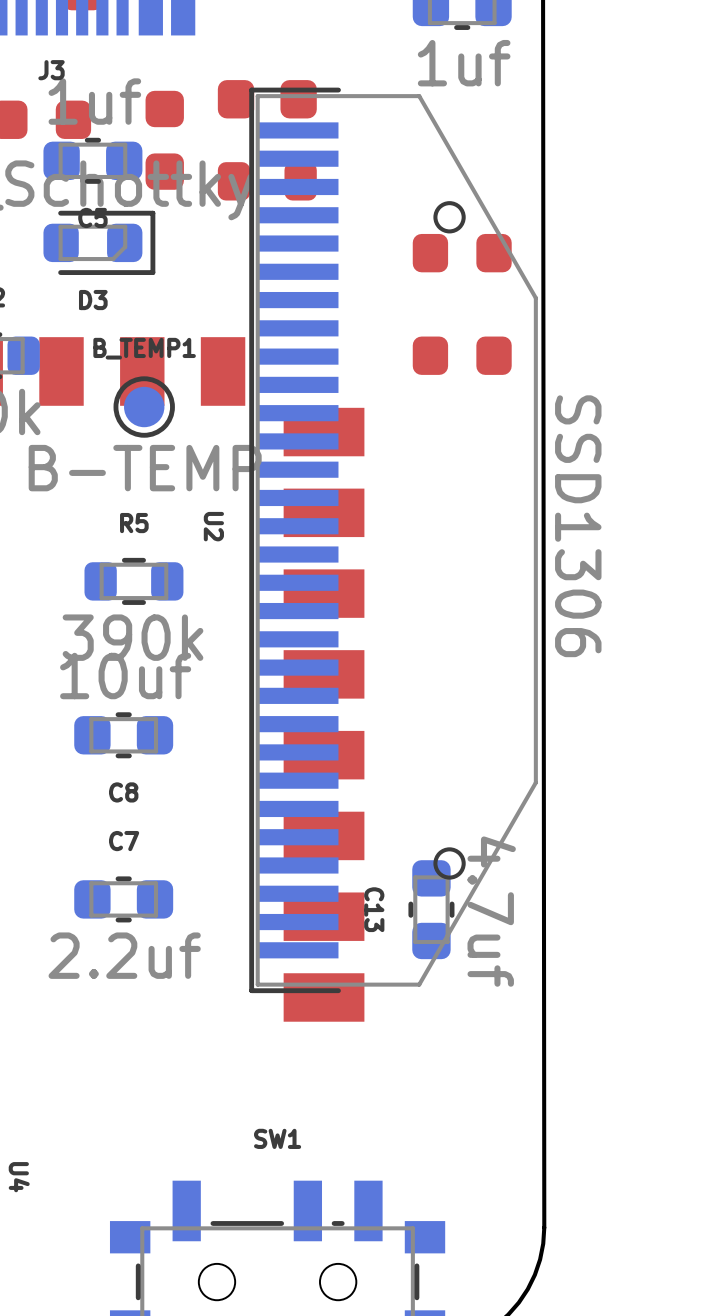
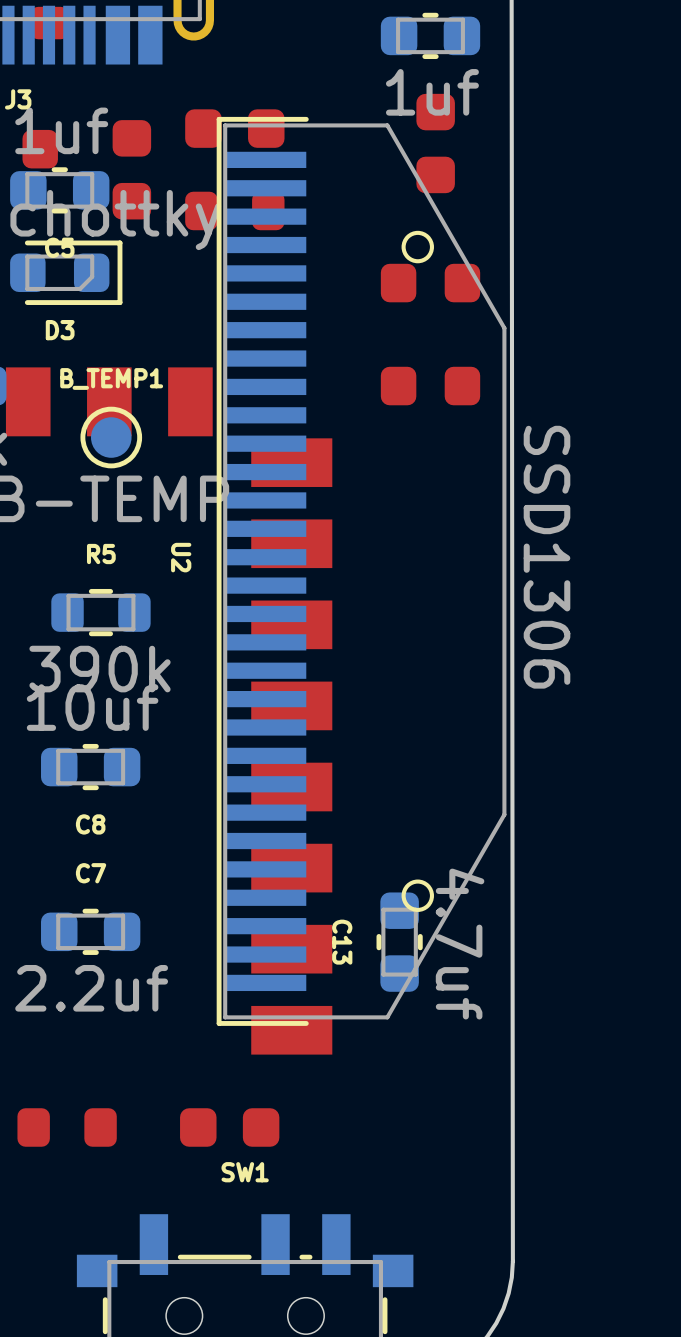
part: none -> (435, 143)
part: none -> (67, 1127)
part: none -> (229, 1127)

